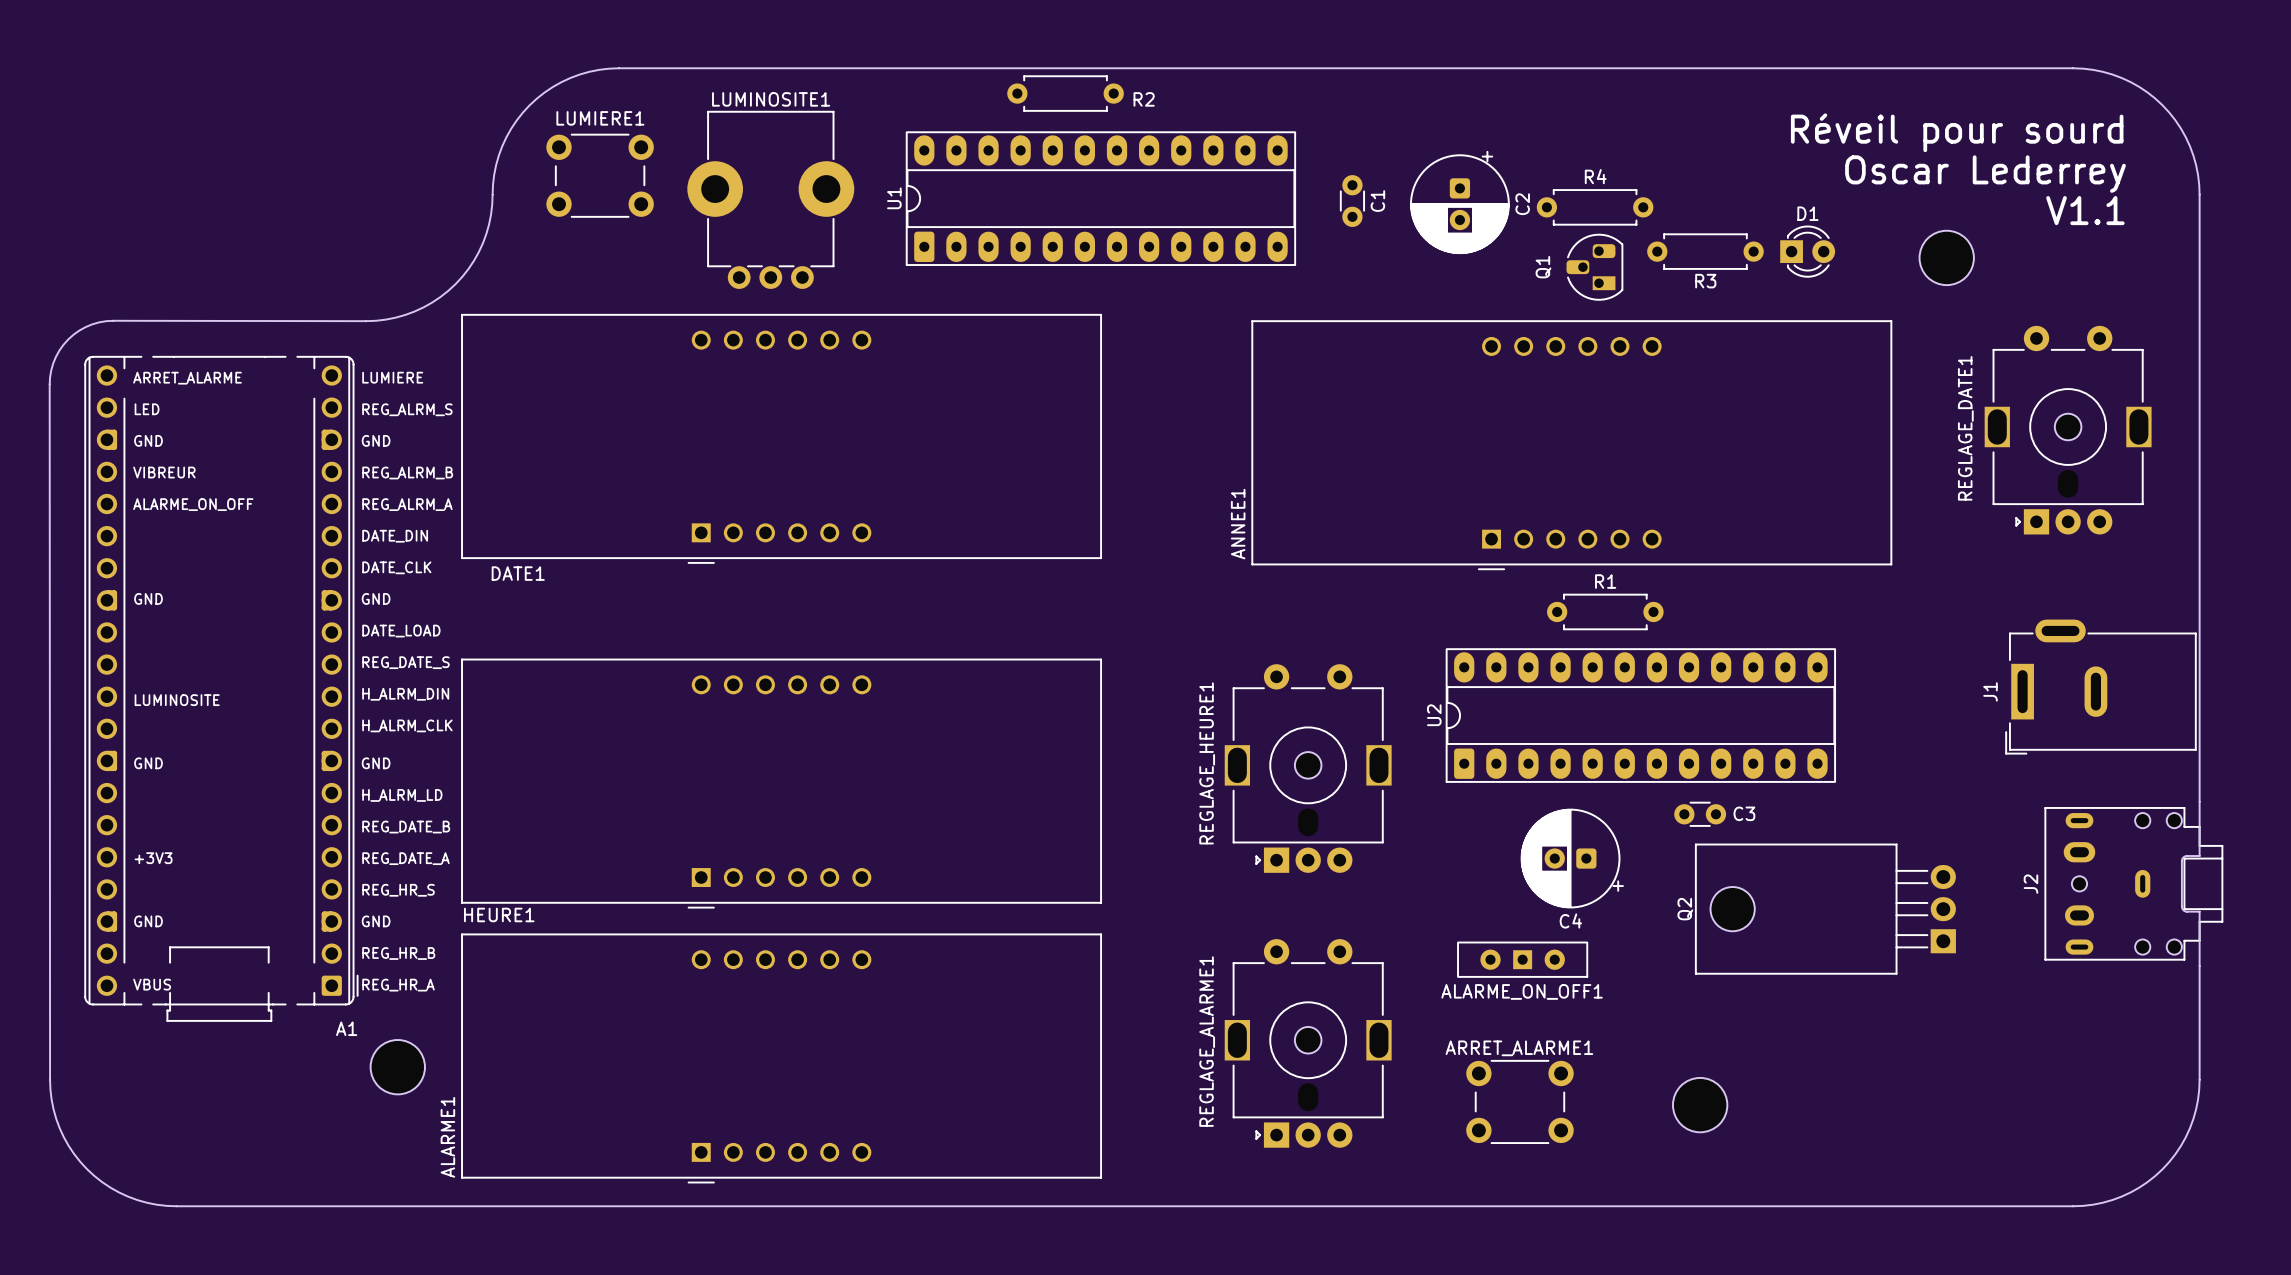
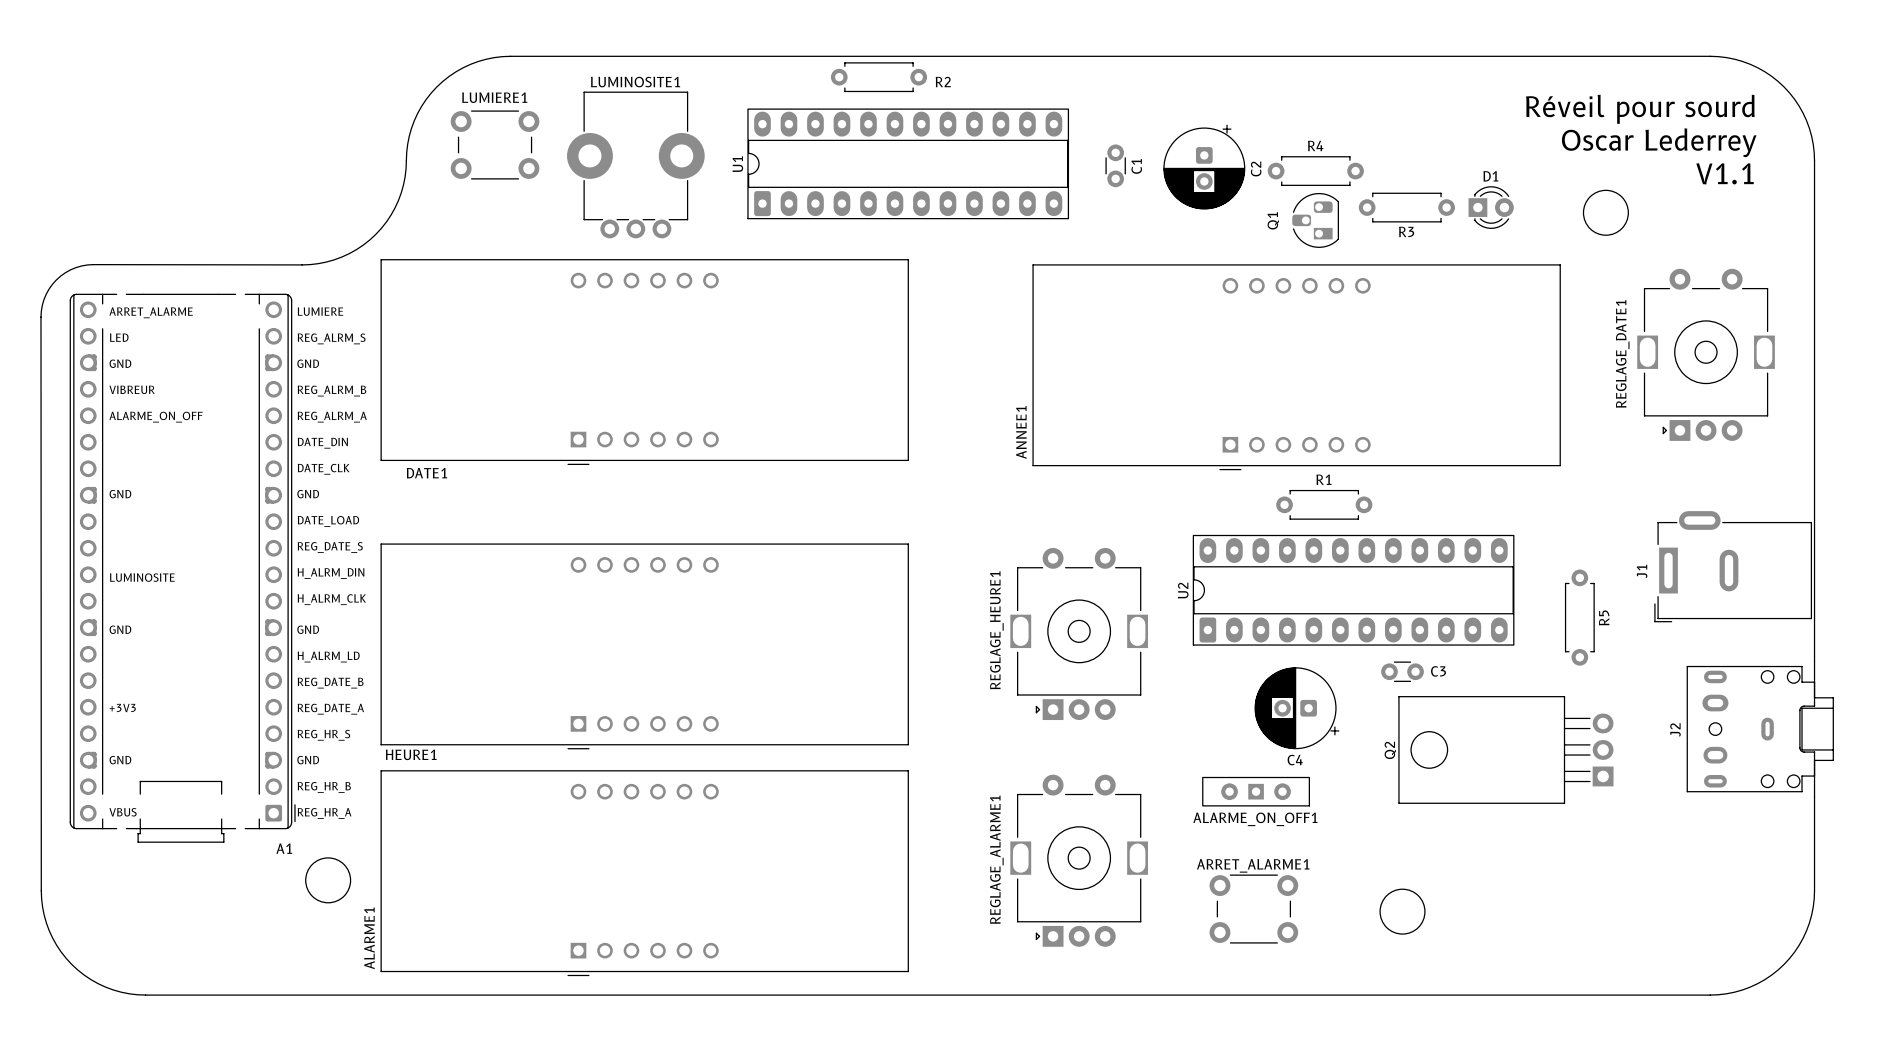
R5: none -> (1579, 617)

